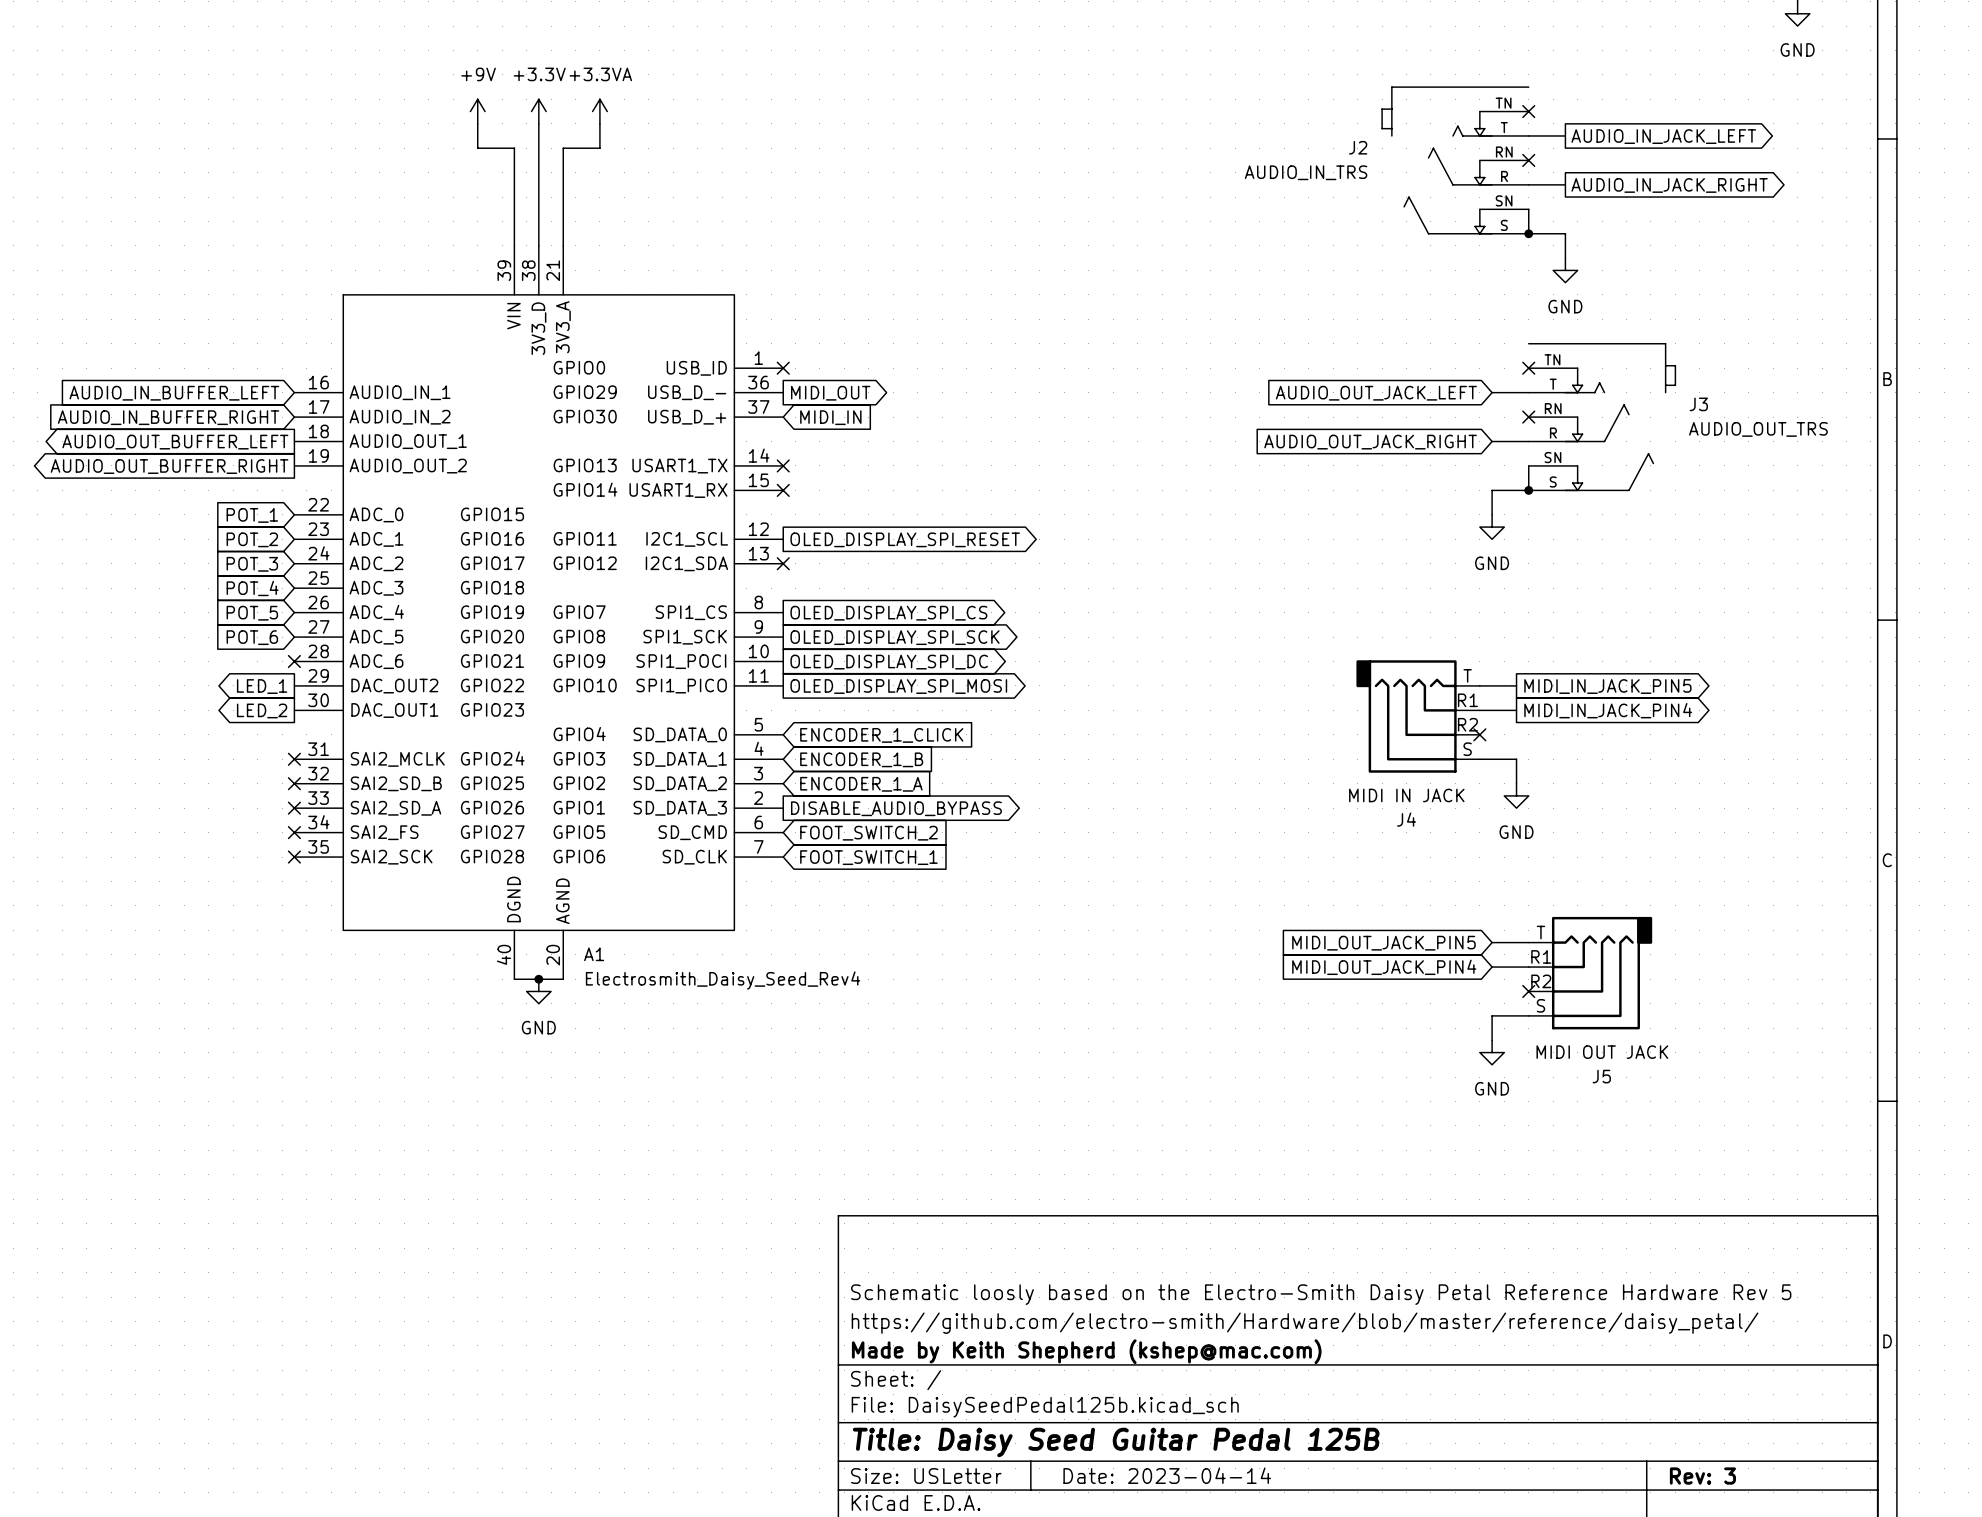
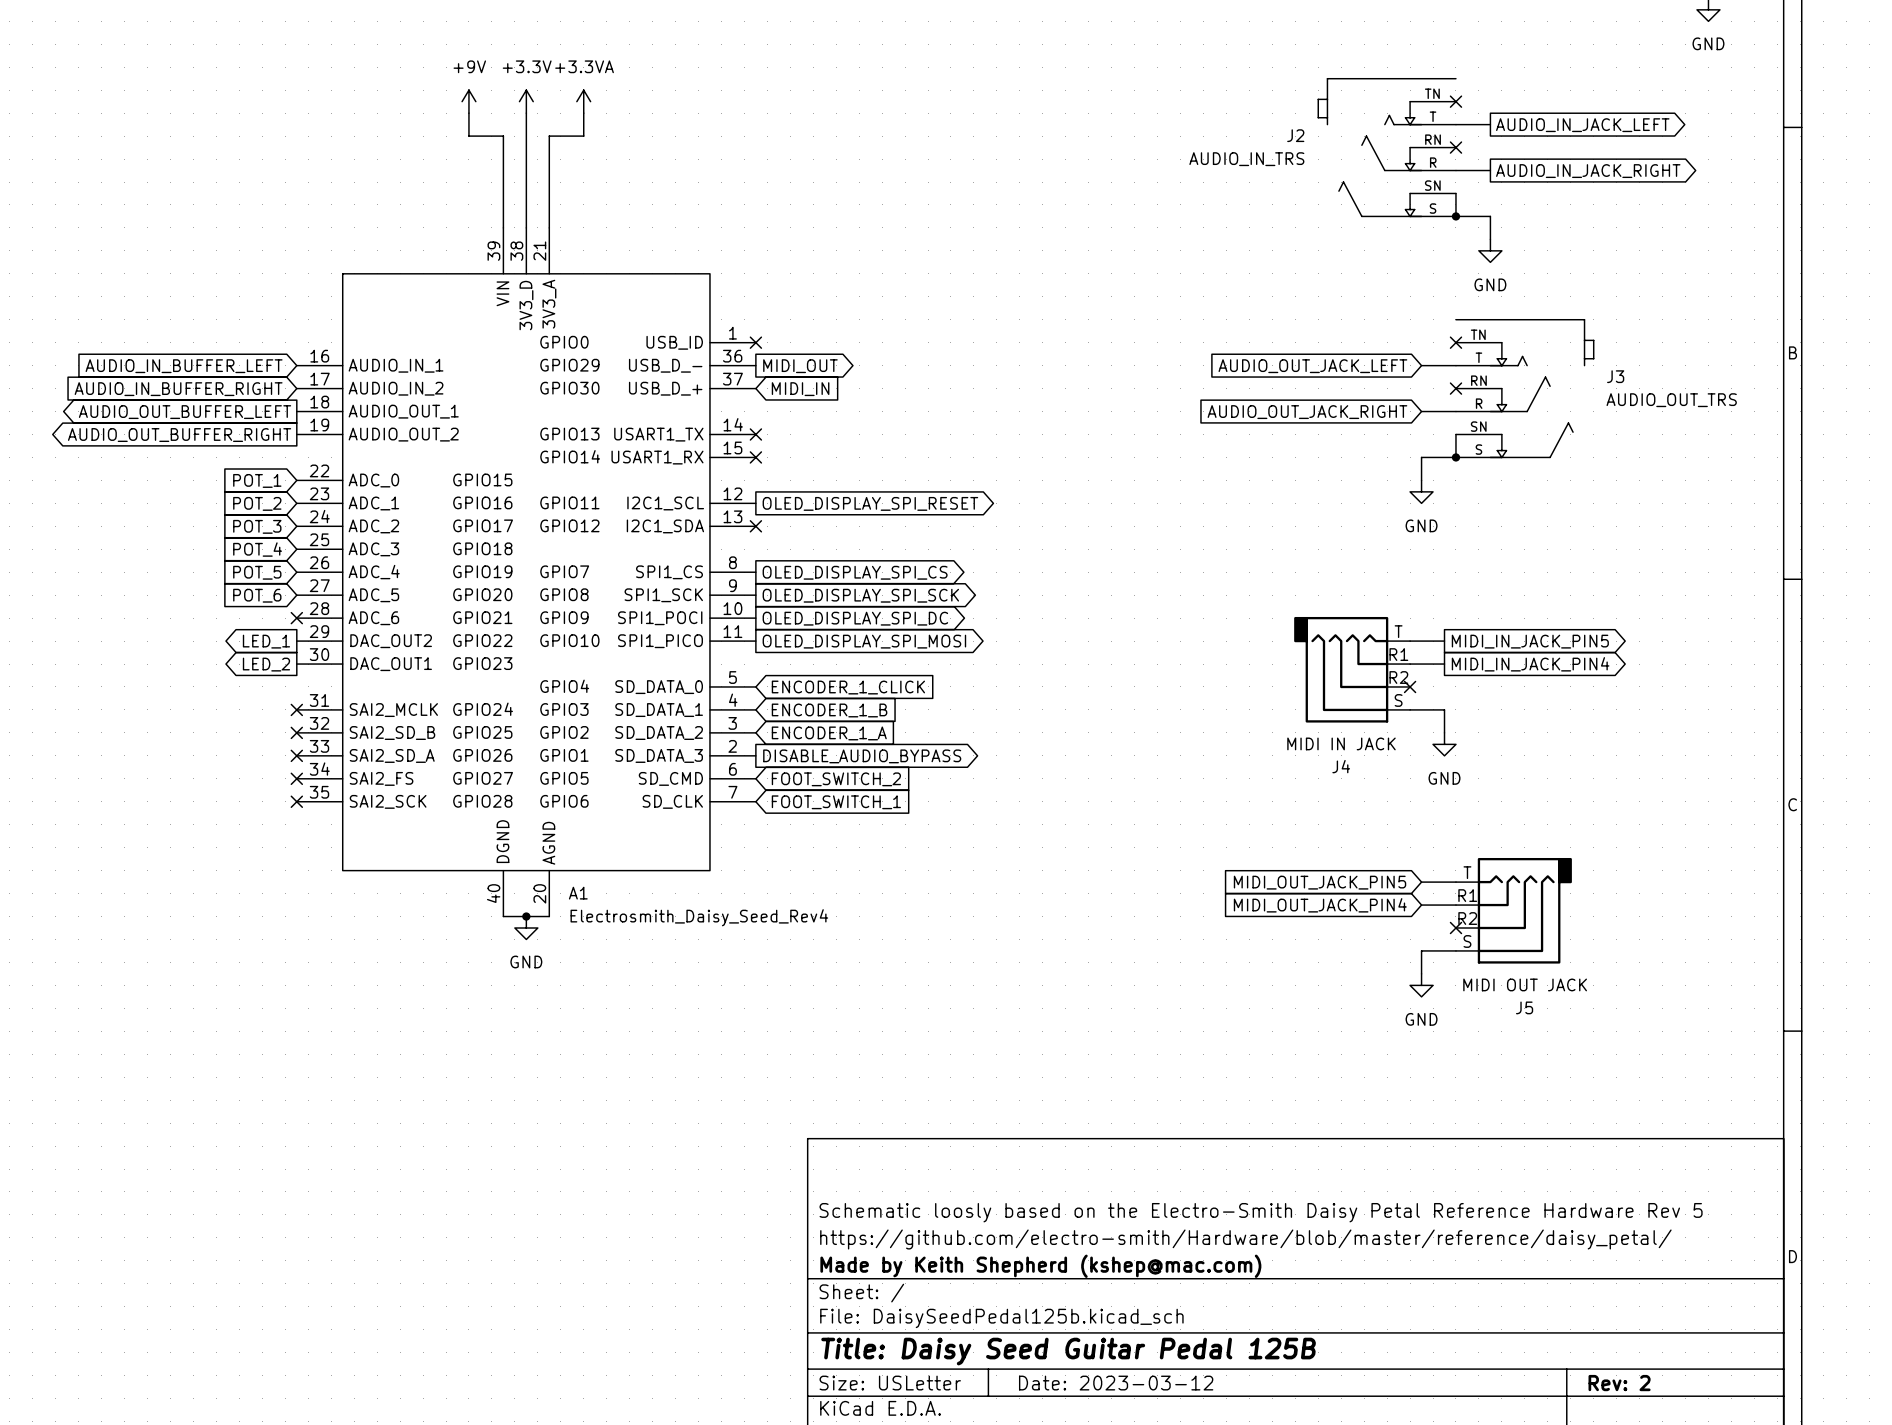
title block: Date: 2023-04-14 (1167, 1475) -> Date: 2023-03-12 (1116, 1383)
title block: Rev: 3 (1702, 1476) -> Rev: 2 (1619, 1383)

